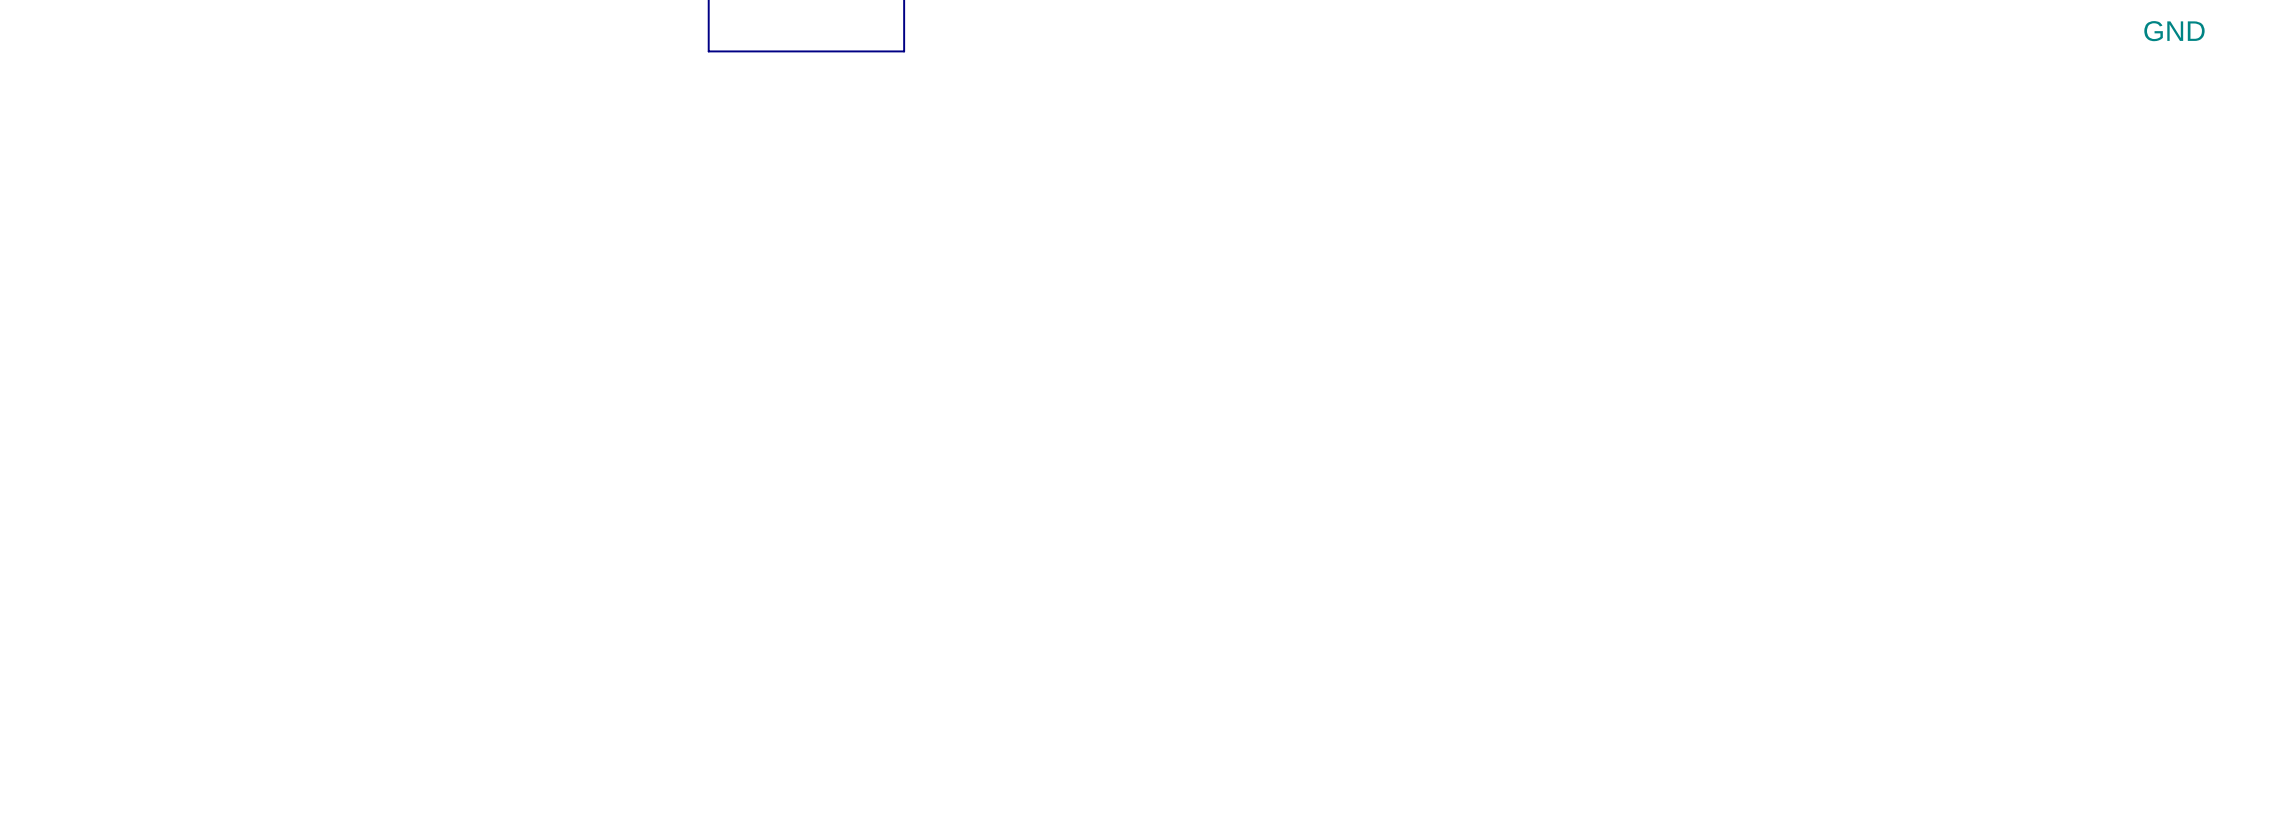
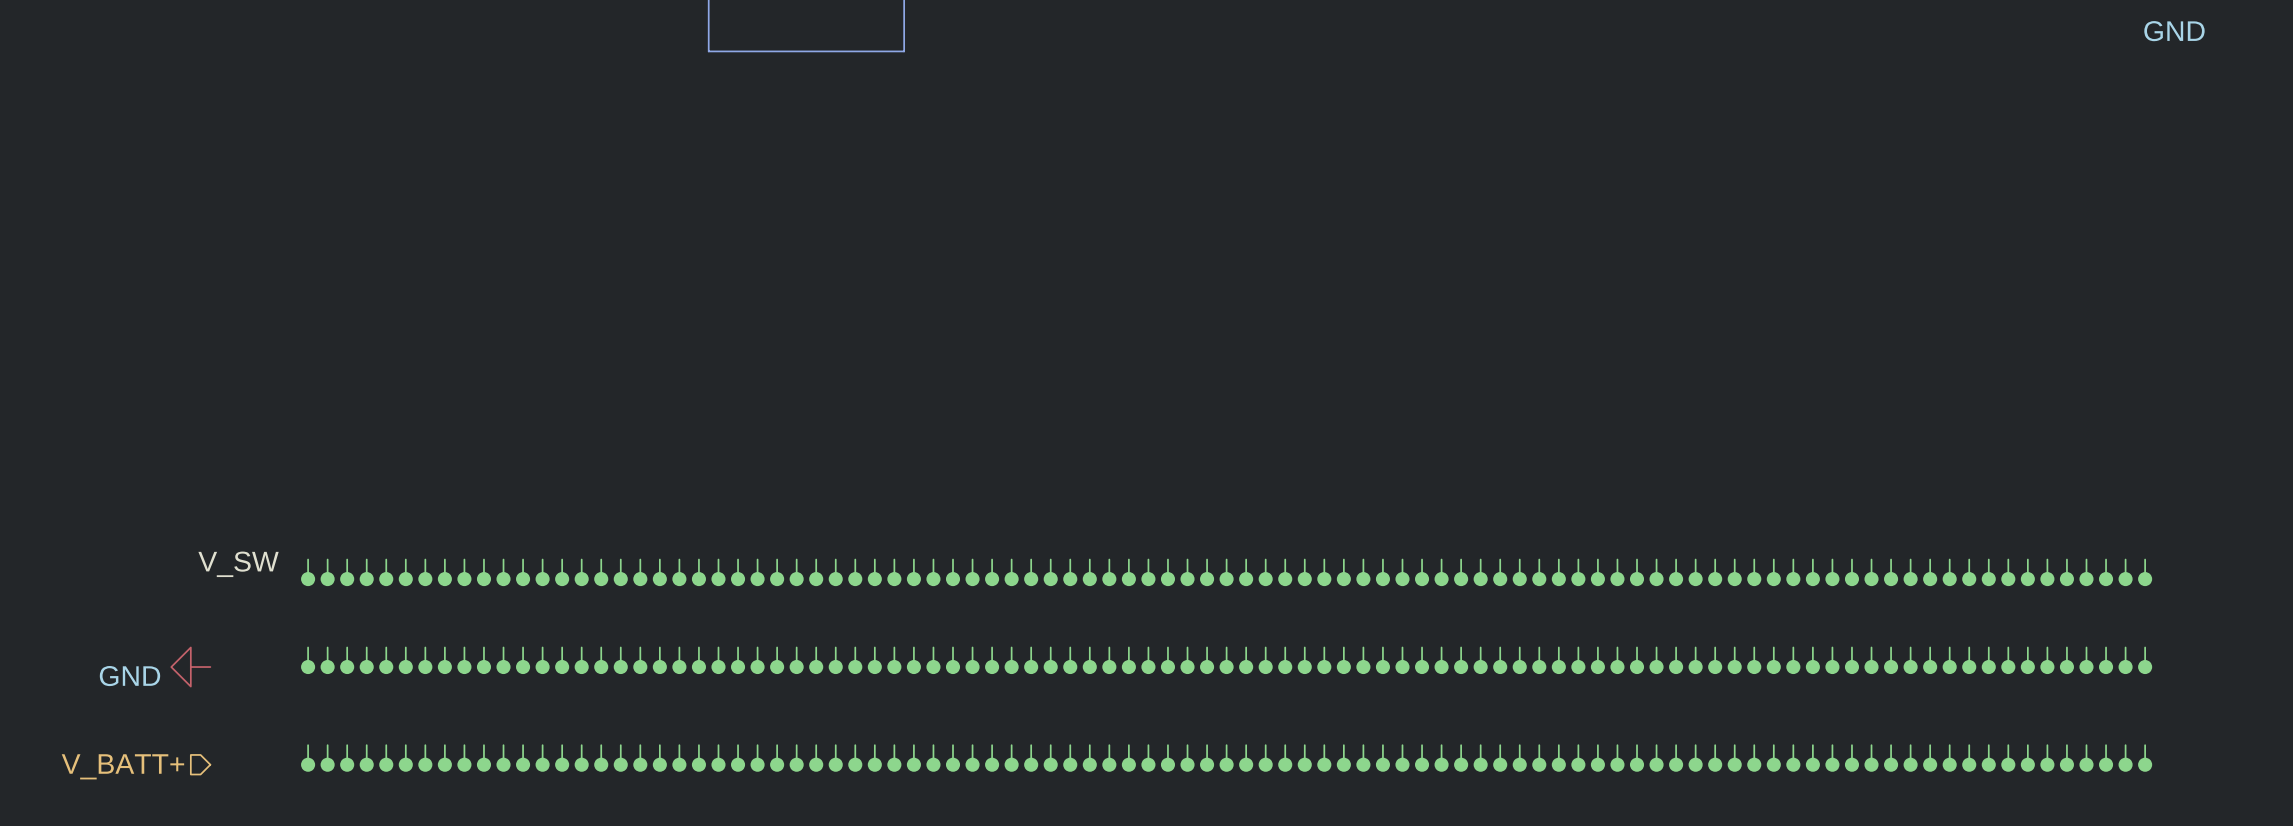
wire: none -> (308, 559) (308, 579)
wire: none -> (327, 559) (327, 579)
wire: none -> (347, 559) (347, 579)
wire: none -> (366, 559) (366, 579)
wire: none -> (386, 559) (386, 579)
wire: none -> (405, 559) (405, 579)
wire: none -> (425, 559) (425, 579)
wire: none -> (444, 559) (444, 579)
wire: none -> (464, 559) (464, 579)
wire: none -> (483, 559) (483, 579)
wire: none -> (503, 559) (503, 579)
wire: none -> (523, 559) (523, 579)
wire: none -> (542, 559) (542, 579)
wire: none -> (562, 559) (562, 579)
wire: none -> (581, 559) (581, 579)
wire: none -> (601, 559) (601, 579)
wire: none -> (620, 559) (620, 579)
wire: none -> (640, 559) (640, 579)
wire: none -> (659, 559) (659, 579)
wire: none -> (679, 559) (679, 579)
wire: none -> (698, 559) (698, 579)
wire: none -> (718, 559) (718, 579)
wire: none -> (738, 559) (738, 579)
wire: none -> (757, 559) (757, 579)
wire: none -> (777, 559) (777, 579)
wire: none -> (796, 559) (796, 579)
wire: none -> (816, 559) (816, 579)
wire: none -> (835, 559) (835, 579)
wire: none -> (855, 559) (855, 579)
wire: none -> (874, 559) (874, 579)
wire: none -> (894, 559) (894, 579)
wire: none -> (913, 559) (913, 579)
wire: none -> (933, 559) (933, 579)
wire: none -> (953, 559) (953, 579)
wire: none -> (972, 559) (972, 579)
wire: none -> (992, 559) (992, 579)
wire: none -> (1011, 559) (1011, 579)
wire: none -> (1031, 559) (1031, 579)
wire: none -> (1050, 559) (1050, 579)
wire: none -> (1070, 559) (1070, 579)
wire: none -> (1089, 559) (1089, 579)
wire: none -> (1109, 559) (1109, 579)
wire: none -> (1128, 559) (1128, 579)
wire: none -> (1148, 559) (1148, 579)
wire: none -> (1167, 559) (1167, 579)
wire: none -> (1187, 559) (1187, 579)
wire: none -> (1207, 559) (1207, 579)
wire: none -> (1226, 559) (1226, 579)
wire: none -> (1246, 559) (1246, 579)
wire: none -> (1265, 559) (1265, 579)
wire: none -> (1285, 559) (1285, 579)
wire: none -> (1304, 559) (1304, 579)
wire: none -> (1324, 559) (1324, 579)
wire: none -> (1343, 559) (1343, 579)
wire: none -> (1363, 559) (1363, 579)
wire: none -> (1382, 559) (1382, 579)
wire: none -> (1402, 559) (1402, 579)
wire: none -> (1422, 559) (1422, 579)
wire: none -> (1441, 559) (1441, 579)
wire: none -> (1461, 559) (1461, 579)
wire: none -> (1480, 559) (1480, 579)
wire: none -> (1500, 559) (1500, 579)
wire: none -> (1519, 559) (1519, 579)
wire: none -> (1539, 559) (1539, 579)
wire: none -> (1558, 559) (1558, 579)
wire: none -> (1578, 559) (1578, 579)
wire: none -> (1597, 559) (1597, 579)
wire: none -> (1617, 559) (1617, 579)
wire: none -> (1637, 559) (1637, 579)
wire: none -> (1656, 559) (1656, 579)
wire: none -> (1676, 559) (1676, 579)
wire: none -> (1695, 559) (1695, 579)
wire: none -> (1715, 559) (1715, 579)
wire: none -> (1734, 559) (1734, 579)
wire: none -> (1754, 559) (1754, 579)
wire: none -> (1773, 559) (1773, 579)
wire: none -> (1793, 559) (1793, 579)
wire: none -> (1812, 559) (1812, 579)
wire: none -> (1832, 559) (1832, 579)
wire: none -> (1851, 559) (1851, 579)
wire: none -> (1871, 559) (1871, 579)
wire: none -> (1891, 559) (1891, 579)
wire: none -> (1910, 559) (1910, 579)
wire: none -> (1930, 559) (1930, 579)
wire: none -> (1949, 559) (1949, 579)
wire: none -> (1969, 559) (1969, 579)
wire: none -> (1988, 559) (1988, 579)
wire: none -> (2008, 559) (2008, 579)
wire: none -> (2027, 559) (2027, 579)
wire: none -> (2047, 559) (2047, 579)
wire: none -> (2066, 559) (2066, 579)
wire: none -> (2086, 559) (2086, 579)
wire: none -> (2106, 559) (2106, 579)
wire: none -> (2125, 559) (2125, 579)
wire: none -> (2145, 559) (2145, 579)
label: none -> V_SW (238, 564)
junction: none -> (308, 579)
junction: none -> (327, 579)
junction: none -> (347, 579)
junction: none -> (366, 579)
junction: none -> (386, 579)
junction: none -> (405, 579)
junction: none -> (425, 579)
junction: none -> (444, 579)
junction: none -> (464, 579)
junction: none -> (483, 579)
junction: none -> (503, 579)
junction: none -> (523, 579)
junction: none -> (542, 579)
junction: none -> (562, 579)
junction: none -> (581, 579)
junction: none -> (601, 579)
junction: none -> (620, 579)
junction: none -> (640, 579)
junction: none -> (659, 579)
junction: none -> (679, 579)
junction: none -> (698, 579)
junction: none -> (718, 579)
junction: none -> (738, 579)
junction: none -> (757, 579)
junction: none -> (777, 579)
junction: none -> (796, 579)
junction: none -> (816, 579)
junction: none -> (835, 579)
junction: none -> (855, 579)
junction: none -> (874, 579)
junction: none -> (894, 579)
junction: none -> (913, 579)
junction: none -> (933, 579)
junction: none -> (953, 579)
junction: none -> (972, 579)
junction: none -> (992, 579)
junction: none -> (1011, 579)
junction: none -> (1031, 579)
junction: none -> (1050, 579)
junction: none -> (1070, 579)
junction: none -> (1089, 579)
junction: none -> (1109, 579)
junction: none -> (1128, 579)
junction: none -> (1148, 579)
junction: none -> (1167, 579)
junction: none -> (1187, 579)
junction: none -> (1207, 579)
junction: none -> (1226, 579)
junction: none -> (1246, 579)
junction: none -> (1265, 579)
junction: none -> (1285, 579)
junction: none -> (1304, 579)
junction: none -> (1324, 579)
junction: none -> (1343, 579)
junction: none -> (1363, 579)
junction: none -> (1382, 579)
junction: none -> (1402, 579)
junction: none -> (1422, 579)
junction: none -> (1441, 579)
junction: none -> (1461, 579)
junction: none -> (1480, 579)
junction: none -> (1500, 579)
junction: none -> (1519, 579)
junction: none -> (1539, 579)
junction: none -> (1558, 579)
junction: none -> (1578, 579)
junction: none -> (1597, 579)
junction: none -> (1617, 579)
junction: none -> (1637, 579)
junction: none -> (1656, 579)
junction: none -> (1676, 579)
junction: none -> (1695, 579)
junction: none -> (1715, 579)
junction: none -> (1734, 579)
junction: none -> (1754, 579)
junction: none -> (1773, 579)
junction: none -> (1793, 579)
junction: none -> (1812, 579)
junction: none -> (1832, 579)
junction: none -> (1851, 579)
junction: none -> (1871, 579)
junction: none -> (1891, 579)
junction: none -> (1910, 579)
junction: none -> (1930, 579)
junction: none -> (1949, 579)
junction: none -> (1969, 579)
junction: none -> (1988, 579)
junction: none -> (2008, 579)
junction: none -> (2027, 579)
junction: none -> (2047, 579)
junction: none -> (2066, 579)
junction: none -> (2086, 579)
junction: none -> (2106, 579)
junction: none -> (2125, 579)
junction: none -> (2145, 579)
wire: none -> (308, 647) (308, 667)
wire: none -> (327, 647) (327, 667)
wire: none -> (347, 647) (347, 667)
wire: none -> (366, 647) (366, 667)
wire: none -> (386, 647) (386, 667)
wire: none -> (405, 647) (405, 667)
wire: none -> (425, 647) (425, 667)
wire: none -> (444, 647) (444, 667)
wire: none -> (464, 647) (464, 667)
wire: none -> (483, 647) (483, 667)
wire: none -> (503, 647) (503, 667)
wire: none -> (523, 647) (523, 667)
wire: none -> (542, 647) (542, 667)
wire: none -> (562, 647) (562, 667)
wire: none -> (581, 647) (581, 667)
wire: none -> (601, 647) (601, 667)
wire: none -> (620, 647) (620, 667)
wire: none -> (640, 647) (640, 667)
wire: none -> (659, 647) (659, 667)
wire: none -> (679, 647) (679, 667)
wire: none -> (698, 647) (698, 667)
wire: none -> (718, 647) (718, 667)
wire: none -> (738, 647) (738, 667)
wire: none -> (757, 647) (757, 667)
wire: none -> (777, 647) (777, 667)
wire: none -> (796, 647) (796, 667)
wire: none -> (816, 647) (816, 667)
wire: none -> (835, 647) (835, 667)
wire: none -> (855, 647) (855, 667)
wire: none -> (874, 647) (874, 667)
wire: none -> (894, 647) (894, 667)
wire: none -> (913, 647) (913, 667)
wire: none -> (933, 647) (933, 667)
wire: none -> (953, 647) (953, 667)
wire: none -> (972, 647) (972, 667)
wire: none -> (992, 647) (992, 667)
wire: none -> (1011, 647) (1011, 667)
wire: none -> (1031, 647) (1031, 667)
wire: none -> (1050, 647) (1050, 667)
wire: none -> (1070, 647) (1070, 667)
wire: none -> (1089, 647) (1089, 667)
wire: none -> (1109, 647) (1109, 667)
wire: none -> (1128, 647) (1128, 667)
wire: none -> (1148, 647) (1148, 667)
wire: none -> (1167, 647) (1167, 667)
wire: none -> (1187, 647) (1187, 667)
wire: none -> (1207, 647) (1207, 667)
wire: none -> (1226, 647) (1226, 667)
wire: none -> (1246, 647) (1246, 667)
wire: none -> (1265, 647) (1265, 667)
wire: none -> (1285, 647) (1285, 667)
wire: none -> (1304, 647) (1304, 667)
wire: none -> (1324, 647) (1324, 667)
wire: none -> (1343, 647) (1343, 667)
wire: none -> (1363, 647) (1363, 667)
wire: none -> (1382, 647) (1382, 667)
wire: none -> (1402, 647) (1402, 667)
wire: none -> (1422, 647) (1422, 667)
wire: none -> (1441, 647) (1441, 667)
wire: none -> (1461, 647) (1461, 667)
wire: none -> (1480, 647) (1480, 667)
wire: none -> (1500, 647) (1500, 667)
wire: none -> (1519, 647) (1519, 667)
wire: none -> (1539, 647) (1539, 667)
wire: none -> (1558, 647) (1558, 667)
wire: none -> (1578, 647) (1578, 667)
wire: none -> (1597, 647) (1597, 667)
wire: none -> (1617, 647) (1617, 667)
wire: none -> (1637, 647) (1637, 667)
wire: none -> (1656, 647) (1656, 667)
wire: none -> (1676, 647) (1676, 667)
wire: none -> (1695, 647) (1695, 667)
wire: none -> (1715, 647) (1715, 667)
wire: none -> (1734, 647) (1734, 667)
wire: none -> (1754, 647) (1754, 667)
wire: none -> (1773, 647) (1773, 667)
wire: none -> (1793, 647) (1793, 667)
wire: none -> (1812, 647) (1812, 667)
wire: none -> (1832, 647) (1832, 667)
wire: none -> (1851, 647) (1851, 667)
wire: none -> (1871, 647) (1871, 667)
wire: none -> (1891, 647) (1891, 667)
wire: none -> (1910, 647) (1910, 667)
wire: none -> (1930, 647) (1930, 667)
wire: none -> (1949, 647) (1949, 667)
wire: none -> (1969, 647) (1969, 667)
wire: none -> (1988, 647) (1988, 667)
wire: none -> (2008, 647) (2008, 667)
wire: none -> (2027, 647) (2027, 667)
wire: none -> (2047, 647) (2047, 667)
wire: none -> (2066, 647) (2066, 667)
wire: none -> (2086, 647) (2086, 667)
wire: none -> (2106, 647) (2106, 667)
wire: none -> (2125, 647) (2125, 667)
wire: none -> (2145, 647) (2145, 667)
power symbol: none -> GND (190, 667)
junction: none -> (308, 667)
junction: none -> (327, 667)
junction: none -> (347, 667)
junction: none -> (366, 667)
junction: none -> (386, 667)
junction: none -> (405, 667)
junction: none -> (425, 667)
junction: none -> (444, 667)
junction: none -> (464, 667)
junction: none -> (483, 667)
junction: none -> (503, 667)
junction: none -> (523, 667)
junction: none -> (542, 667)
junction: none -> (562, 667)
junction: none -> (581, 667)
junction: none -> (601, 667)
junction: none -> (620, 667)
junction: none -> (640, 667)
junction: none -> (659, 667)
junction: none -> (679, 667)
junction: none -> (698, 667)
junction: none -> (718, 667)
junction: none -> (738, 667)
junction: none -> (757, 667)
junction: none -> (777, 667)
junction: none -> (796, 667)
junction: none -> (816, 667)
junction: none -> (835, 667)
junction: none -> (855, 667)
junction: none -> (874, 667)
junction: none -> (894, 667)
junction: none -> (913, 667)
junction: none -> (933, 667)
junction: none -> (953, 667)
junction: none -> (972, 667)
junction: none -> (992, 667)
junction: none -> (1011, 667)
junction: none -> (1031, 667)
junction: none -> (1050, 667)
junction: none -> (1070, 667)
junction: none -> (1089, 667)
junction: none -> (1109, 667)
junction: none -> (1128, 667)
junction: none -> (1148, 667)
junction: none -> (1167, 667)
junction: none -> (1187, 667)
junction: none -> (1207, 667)
junction: none -> (1226, 667)
junction: none -> (1246, 667)
junction: none -> (1265, 667)
junction: none -> (1285, 667)
junction: none -> (1304, 667)
junction: none -> (1324, 667)
junction: none -> (1343, 667)
junction: none -> (1363, 667)
junction: none -> (1382, 667)
junction: none -> (1402, 667)
junction: none -> (1422, 667)
junction: none -> (1441, 667)
junction: none -> (1461, 667)
junction: none -> (1480, 667)
junction: none -> (1500, 667)
junction: none -> (1519, 667)
junction: none -> (1539, 667)
junction: none -> (1558, 667)
junction: none -> (1578, 667)
junction: none -> (1597, 667)
junction: none -> (1617, 667)
junction: none -> (1637, 667)
junction: none -> (1656, 667)
junction: none -> (1676, 667)
junction: none -> (1695, 667)
junction: none -> (1715, 667)
junction: none -> (1734, 667)
junction: none -> (1754, 667)
junction: none -> (1773, 667)
junction: none -> (1793, 667)
junction: none -> (1812, 667)
junction: none -> (1832, 667)
junction: none -> (1851, 667)
junction: none -> (1871, 667)
junction: none -> (1891, 667)
junction: none -> (1910, 667)
junction: none -> (1930, 667)
junction: none -> (1949, 667)
junction: none -> (1969, 667)
junction: none -> (1988, 667)
junction: none -> (2008, 667)
junction: none -> (2027, 667)
junction: none -> (2047, 667)
junction: none -> (2066, 667)
junction: none -> (2086, 667)
junction: none -> (2106, 667)
junction: none -> (2125, 667)
junction: none -> (2145, 667)
wire: none -> (308, 745) (308, 764)
wire: none -> (327, 745) (327, 764)
wire: none -> (347, 745) (347, 764)
wire: none -> (366, 745) (366, 764)
wire: none -> (386, 745) (386, 764)
wire: none -> (405, 745) (405, 764)
wire: none -> (425, 745) (425, 764)
wire: none -> (444, 745) (444, 764)
wire: none -> (464, 745) (464, 764)
wire: none -> (483, 745) (483, 764)
wire: none -> (503, 745) (503, 764)
wire: none -> (523, 745) (523, 764)
wire: none -> (542, 745) (542, 764)
wire: none -> (562, 745) (562, 764)
wire: none -> (581, 745) (581, 764)
wire: none -> (601, 745) (601, 764)
wire: none -> (620, 745) (620, 764)
wire: none -> (640, 745) (640, 764)
wire: none -> (659, 745) (659, 764)
wire: none -> (679, 745) (679, 764)
wire: none -> (698, 745) (698, 764)
wire: none -> (718, 745) (718, 764)
wire: none -> (738, 745) (738, 764)
wire: none -> (757, 745) (757, 764)
wire: none -> (777, 745) (777, 764)
wire: none -> (796, 745) (796, 764)
wire: none -> (816, 745) (816, 764)
wire: none -> (835, 745) (835, 764)
wire: none -> (855, 745) (855, 764)
wire: none -> (874, 745) (874, 764)
wire: none -> (894, 745) (894, 764)
wire: none -> (913, 745) (913, 764)
wire: none -> (933, 745) (933, 764)
wire: none -> (953, 745) (953, 764)
wire: none -> (972, 745) (972, 764)
wire: none -> (992, 745) (992, 764)
wire: none -> (1011, 745) (1011, 764)
wire: none -> (1031, 745) (1031, 764)
wire: none -> (1050, 745) (1050, 764)
wire: none -> (1070, 745) (1070, 764)
wire: none -> (1089, 745) (1089, 764)
wire: none -> (1109, 745) (1109, 764)
wire: none -> (1128, 745) (1128, 764)
wire: none -> (1148, 745) (1148, 764)
wire: none -> (1167, 745) (1167, 764)
wire: none -> (1187, 745) (1187, 764)
wire: none -> (1207, 745) (1207, 764)
wire: none -> (1226, 745) (1226, 764)
wire: none -> (1246, 745) (1246, 764)
wire: none -> (1265, 745) (1265, 764)
wire: none -> (1285, 745) (1285, 764)
wire: none -> (1304, 745) (1304, 764)
wire: none -> (1324, 745) (1324, 764)
wire: none -> (1343, 745) (1343, 764)
wire: none -> (1363, 745) (1363, 764)
wire: none -> (1382, 745) (1382, 764)
wire: none -> (1402, 745) (1402, 764)
wire: none -> (1422, 745) (1422, 764)
wire: none -> (1441, 745) (1441, 764)
wire: none -> (1461, 745) (1461, 764)
wire: none -> (1480, 745) (1480, 764)
wire: none -> (1500, 745) (1500, 764)
wire: none -> (1519, 745) (1519, 764)
wire: none -> (1539, 745) (1539, 764)
wire: none -> (1558, 745) (1558, 764)
wire: none -> (1578, 745) (1578, 764)
wire: none -> (1597, 745) (1597, 764)
wire: none -> (1617, 745) (1617, 764)
wire: none -> (1637, 745) (1637, 764)
wire: none -> (1656, 745) (1656, 764)
wire: none -> (1676, 745) (1676, 764)
wire: none -> (1695, 745) (1695, 764)
wire: none -> (1715, 745) (1715, 764)
wire: none -> (1734, 745) (1734, 764)
wire: none -> (1754, 745) (1754, 764)
wire: none -> (1773, 745) (1773, 764)
wire: none -> (1793, 745) (1793, 764)
wire: none -> (1812, 745) (1812, 764)
wire: none -> (1832, 745) (1832, 764)
wire: none -> (1851, 745) (1851, 764)
wire: none -> (1871, 745) (1871, 764)
wire: none -> (1891, 745) (1891, 764)
wire: none -> (1910, 745) (1910, 764)
wire: none -> (1930, 745) (1930, 764)
wire: none -> (1949, 745) (1949, 764)
wire: none -> (1969, 745) (1969, 764)
wire: none -> (1988, 745) (1988, 764)
wire: none -> (2008, 745) (2008, 764)
wire: none -> (2027, 745) (2027, 764)
wire: none -> (2047, 745) (2047, 764)
wire: none -> (2066, 745) (2066, 764)
wire: none -> (2086, 745) (2086, 764)
wire: none -> (2106, 745) (2106, 764)
wire: none -> (2125, 745) (2125, 764)
wire: none -> (2145, 745) (2145, 764)
junction: none -> (308, 764)
junction: none -> (327, 764)
junction: none -> (347, 764)
junction: none -> (366, 764)
junction: none -> (386, 764)
junction: none -> (405, 764)
junction: none -> (425, 764)
junction: none -> (444, 764)
junction: none -> (464, 764)
junction: none -> (483, 764)
junction: none -> (503, 764)
junction: none -> (523, 764)
junction: none -> (542, 764)
junction: none -> (562, 764)
junction: none -> (581, 764)
junction: none -> (601, 764)
junction: none -> (620, 764)
junction: none -> (640, 764)
junction: none -> (659, 764)
junction: none -> (679, 764)
junction: none -> (698, 764)
junction: none -> (718, 764)
junction: none -> (738, 764)
junction: none -> (757, 764)
junction: none -> (777, 764)
junction: none -> (796, 764)
junction: none -> (816, 764)
junction: none -> (835, 764)
junction: none -> (855, 764)
junction: none -> (874, 764)
junction: none -> (894, 764)
junction: none -> (913, 764)
junction: none -> (933, 764)
junction: none -> (953, 764)
junction: none -> (972, 764)
junction: none -> (992, 764)
junction: none -> (1011, 764)
junction: none -> (1031, 764)
junction: none -> (1050, 764)
junction: none -> (1070, 764)
junction: none -> (1089, 764)
junction: none -> (1109, 764)
junction: none -> (1128, 764)
junction: none -> (1148, 764)
junction: none -> (1167, 764)
junction: none -> (1187, 764)
junction: none -> (1207, 764)
junction: none -> (1226, 764)
junction: none -> (1246, 764)
junction: none -> (1265, 764)
junction: none -> (1285, 764)
junction: none -> (1304, 764)
junction: none -> (1324, 764)
junction: none -> (1343, 764)
junction: none -> (1363, 764)
junction: none -> (1382, 764)
junction: none -> (1402, 764)
junction: none -> (1422, 764)
junction: none -> (1441, 764)
junction: none -> (1461, 764)
junction: none -> (1480, 764)
junction: none -> (1500, 764)
junction: none -> (1519, 764)
junction: none -> (1539, 764)
junction: none -> (1558, 764)
junction: none -> (1578, 764)
junction: none -> (1597, 764)
junction: none -> (1617, 764)
junction: none -> (1637, 764)
junction: none -> (1656, 764)
junction: none -> (1676, 764)
junction: none -> (1695, 764)
junction: none -> (1715, 764)
junction: none -> (1734, 764)
junction: none -> (1754, 764)
junction: none -> (1773, 764)
junction: none -> (1793, 764)
junction: none -> (1812, 764)
junction: none -> (1832, 764)
junction: none -> (1851, 764)
junction: none -> (1871, 764)
junction: none -> (1891, 764)
junction: none -> (1910, 764)
junction: none -> (1930, 764)
junction: none -> (1949, 764)
junction: none -> (1969, 764)
junction: none -> (1988, 764)
junction: none -> (2008, 764)
junction: none -> (2027, 764)
junction: none -> (2047, 764)
junction: none -> (2066, 764)
junction: none -> (2086, 764)
junction: none -> (2106, 764)
junction: none -> (2125, 764)
junction: none -> (2145, 764)
hierarchical label: none -> V_BATT+ (122, 766)

